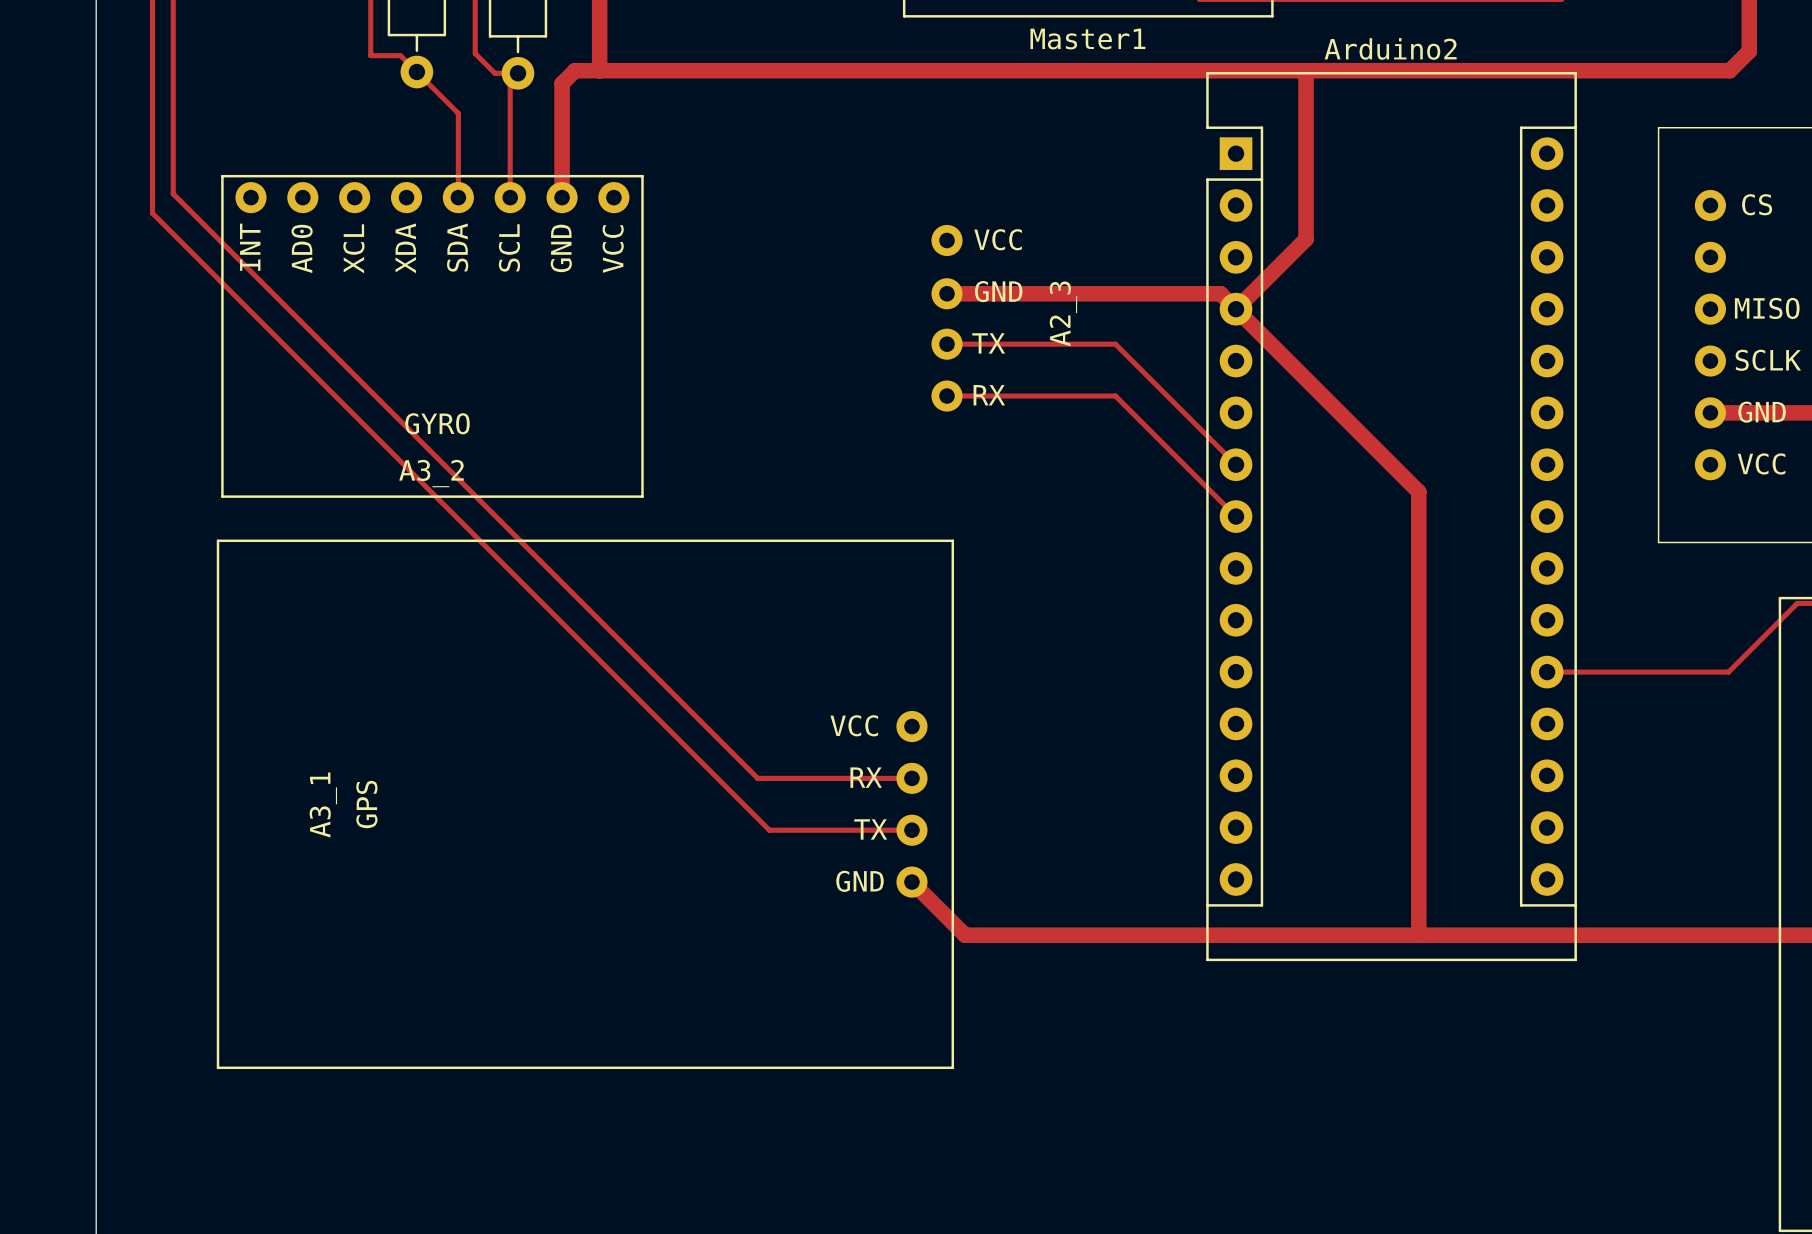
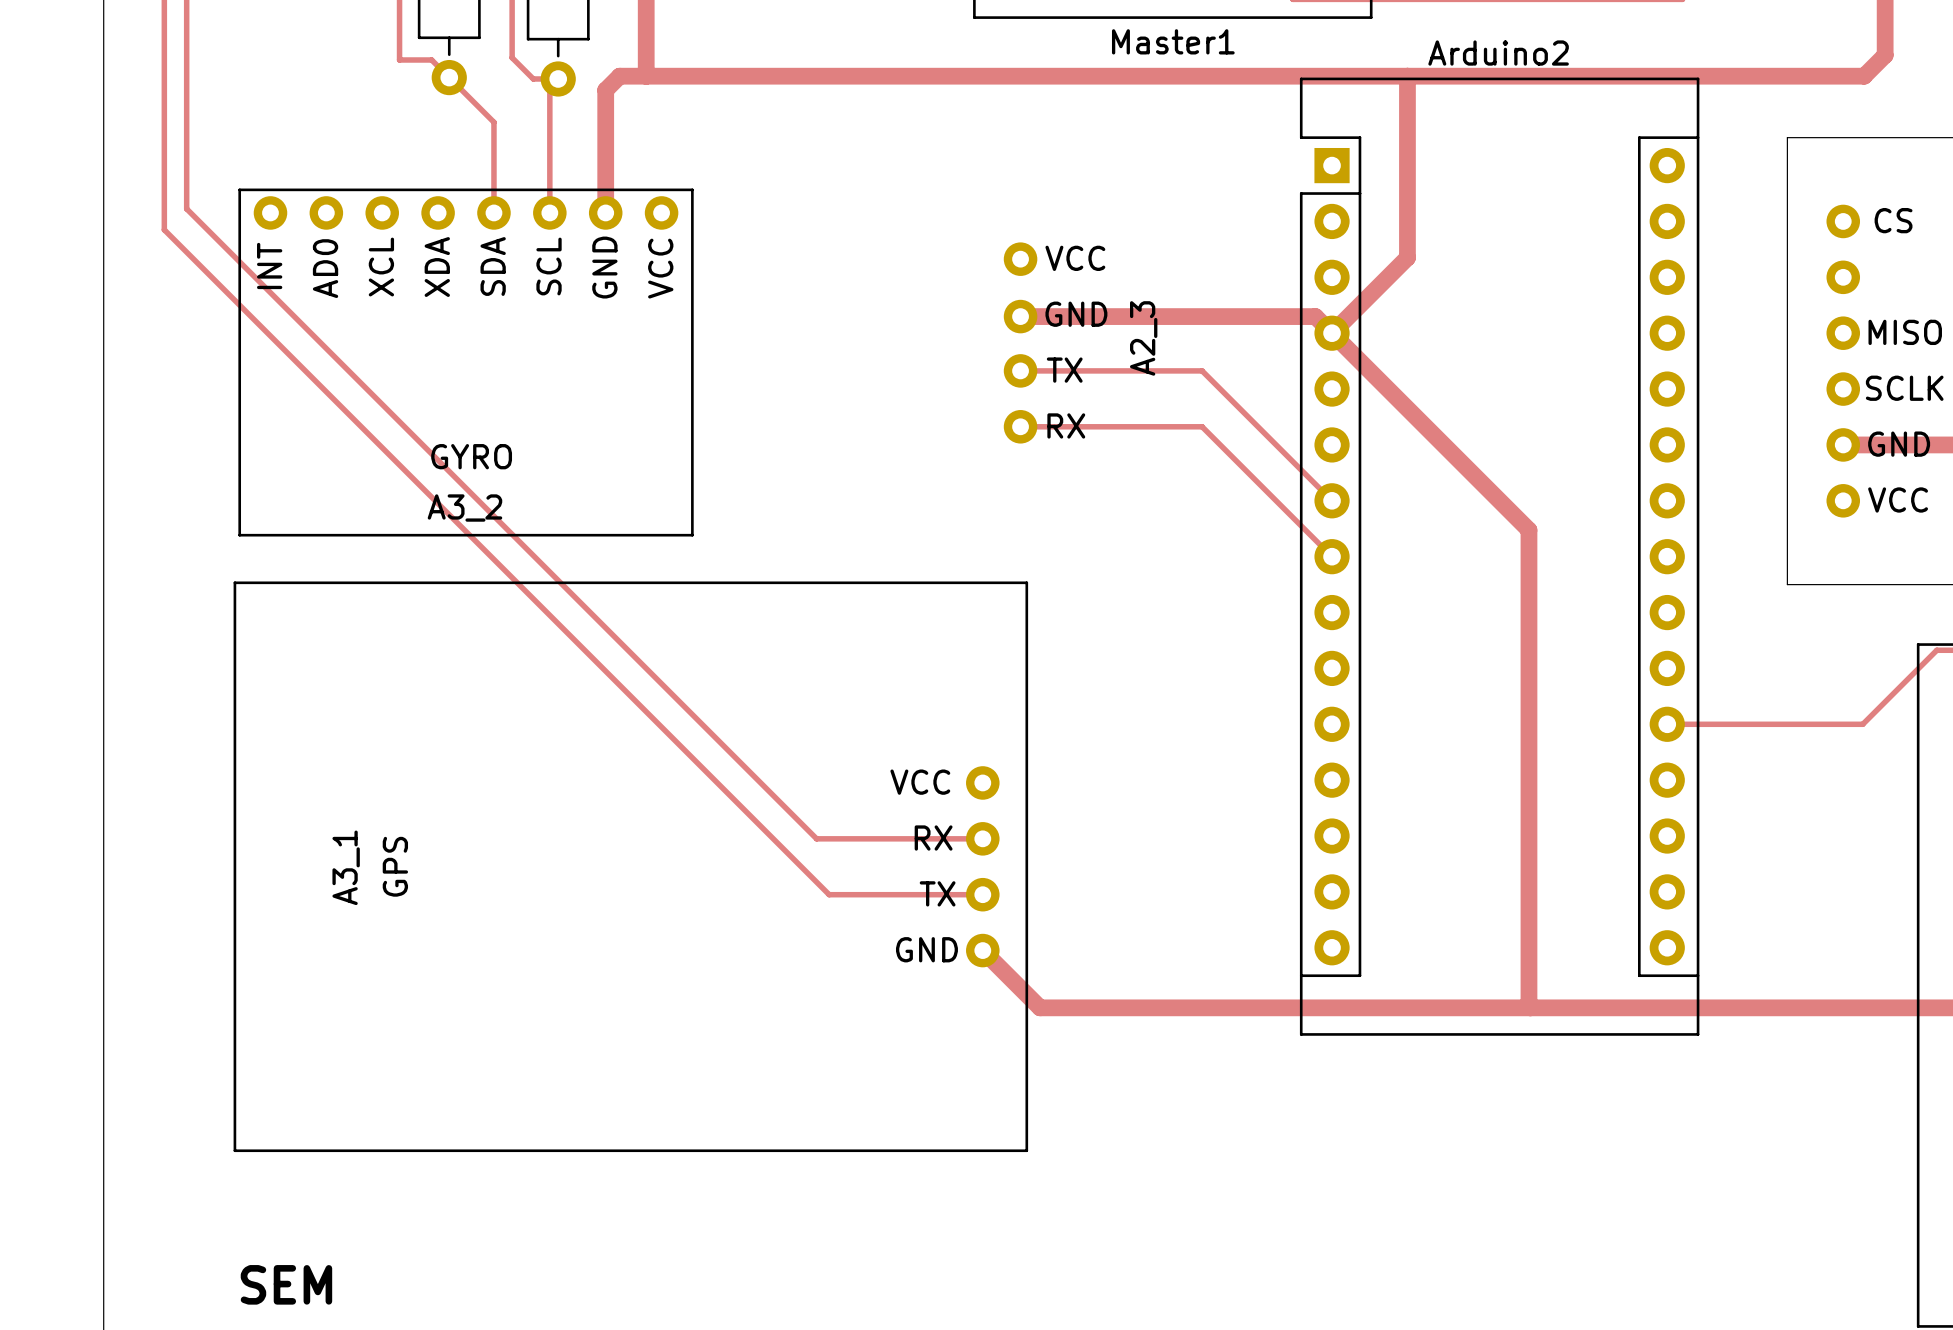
text: none -> SEM (286, 1284)

